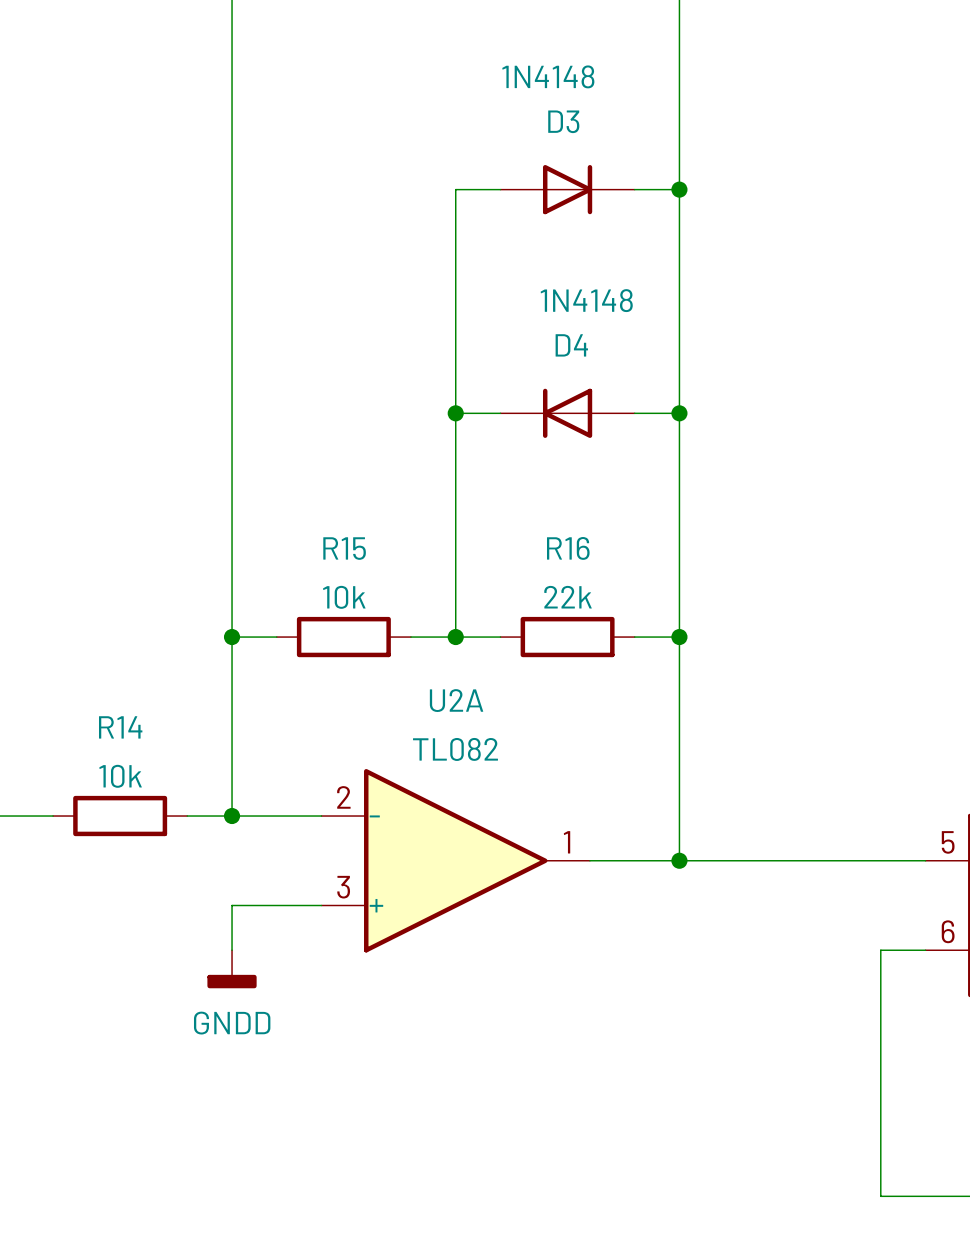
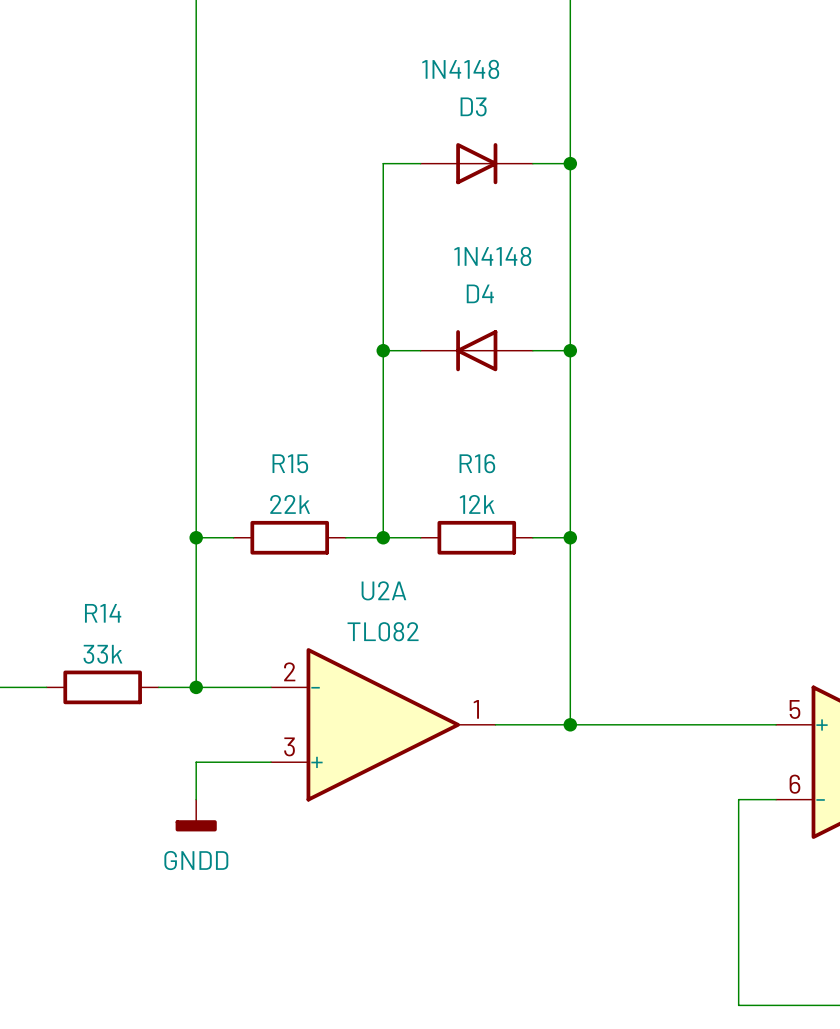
R15 value: 10k (344, 597) -> 22k (290, 504)
R16 value: 22k (568, 597) -> 12k (477, 504)
R14 value: 10k (120, 776) -> 33k (102, 654)

